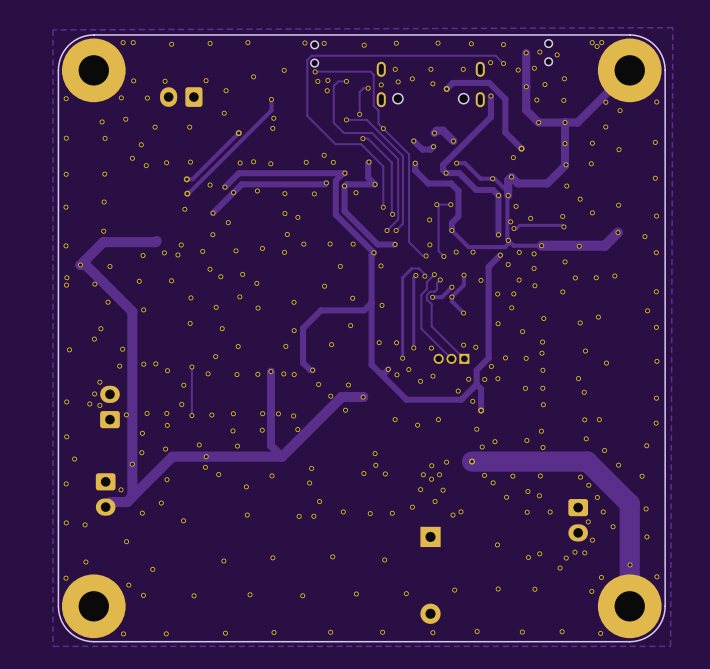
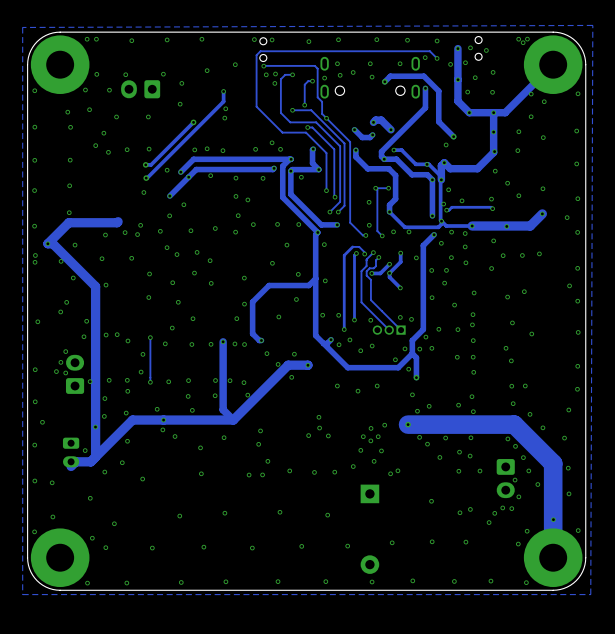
part footprint: [95, 473, 116, 516] -> [62, 437, 80, 468]

